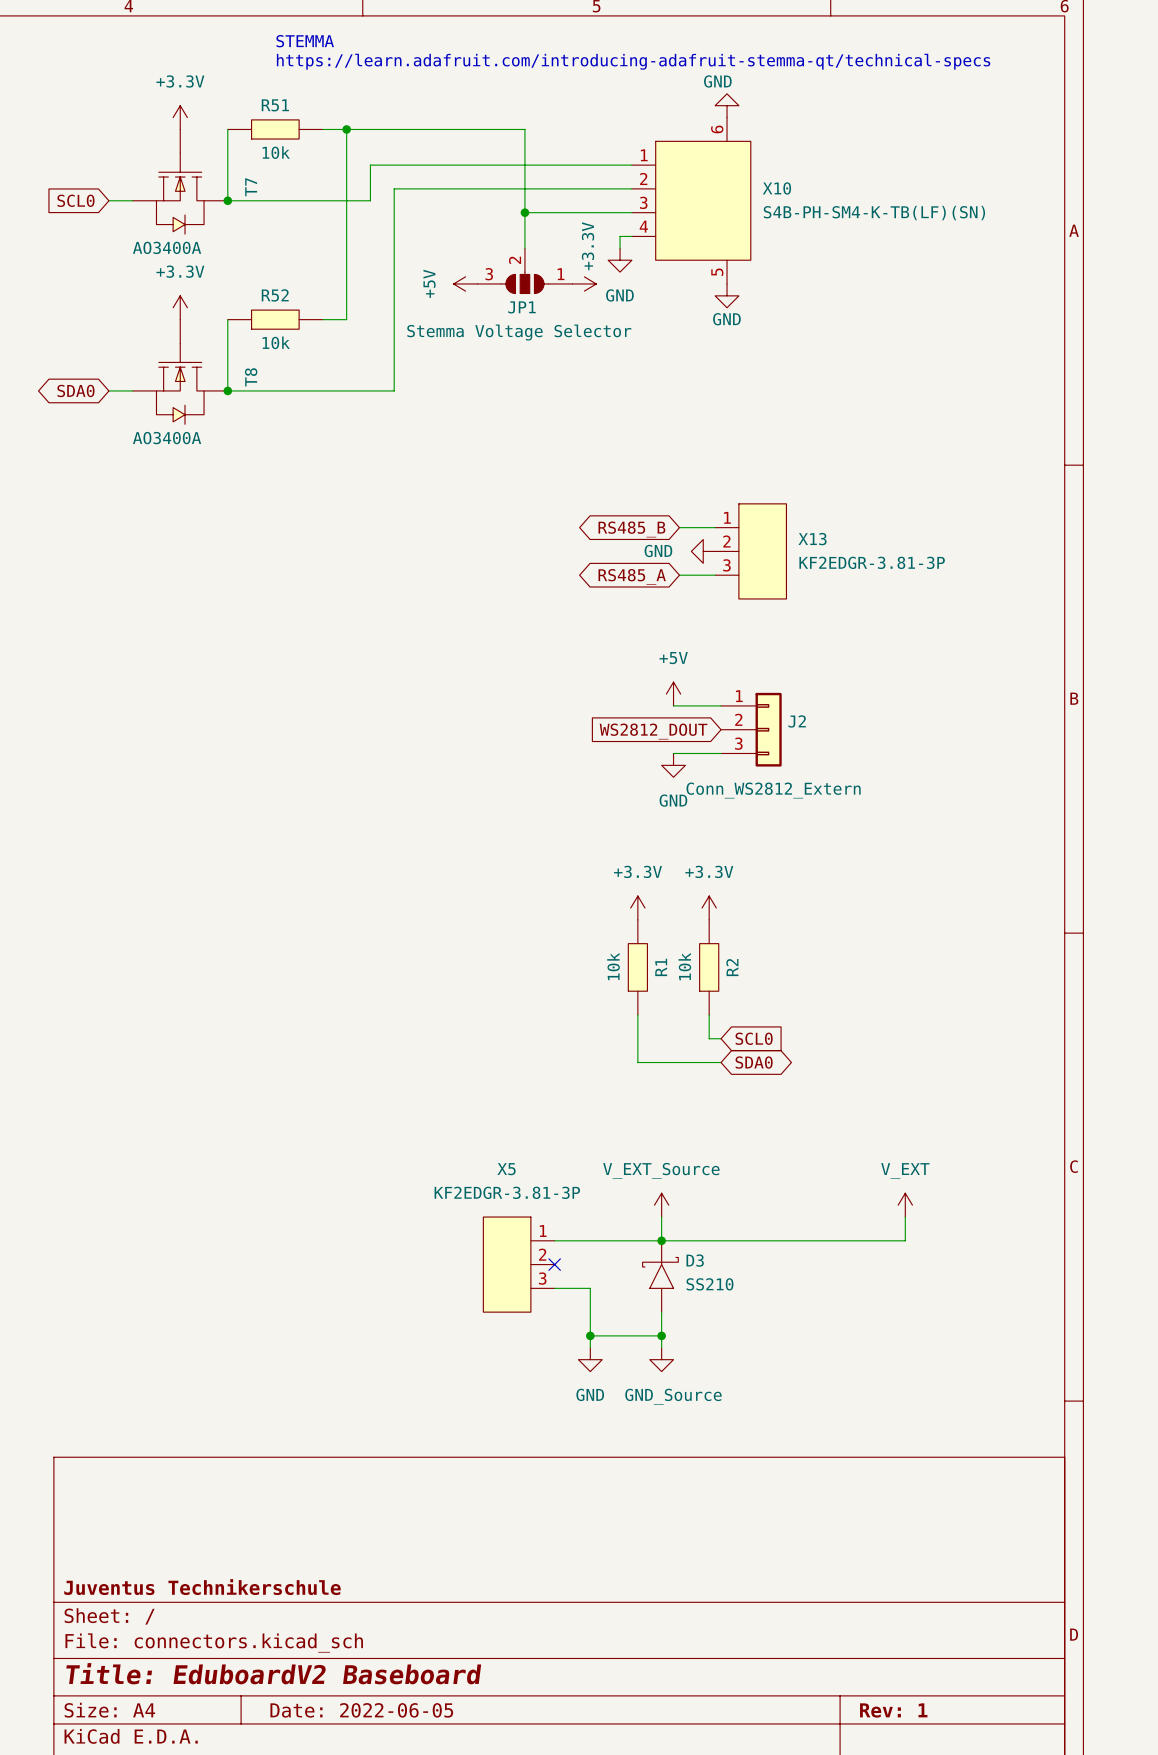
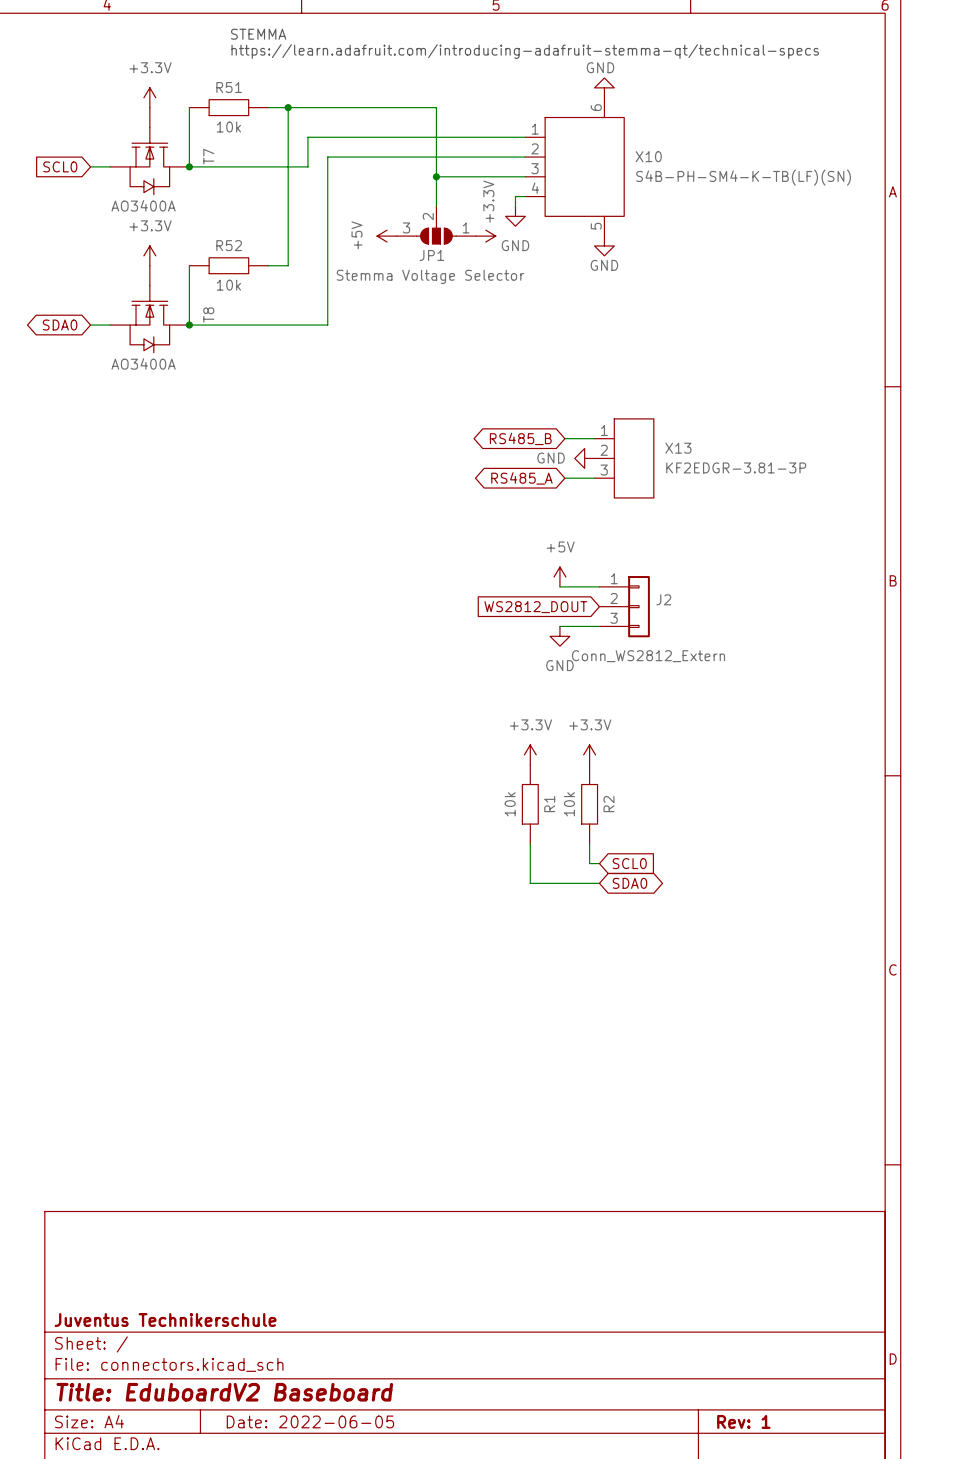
power symbol: V_EXT_Source (661, 1205) -> none
power symbol: V_EXT (905, 1205) -> none
wire: (661, 1217) (661, 1240) -> none
wire: (905, 1217) (905, 1240) (554, 1240) -> none
junction: (661, 1240) -> none
X5: KF2EDGR-3.81-3P (519, 1264) -> none
no-connect mark: (554, 1264) -> none
D3: SS210 (660, 1276) -> none
wire: (554, 1288) (590, 1288) (590, 1347) -> none
wire: (661, 1312) (661, 1347) -> none
wire: (590, 1335) (661, 1335) -> none
junction: (590, 1335) -> none
junction: (661, 1335) -> none
power symbol: GND (590, 1359) -> none
power symbol: GND_Source (661, 1359) -> none

